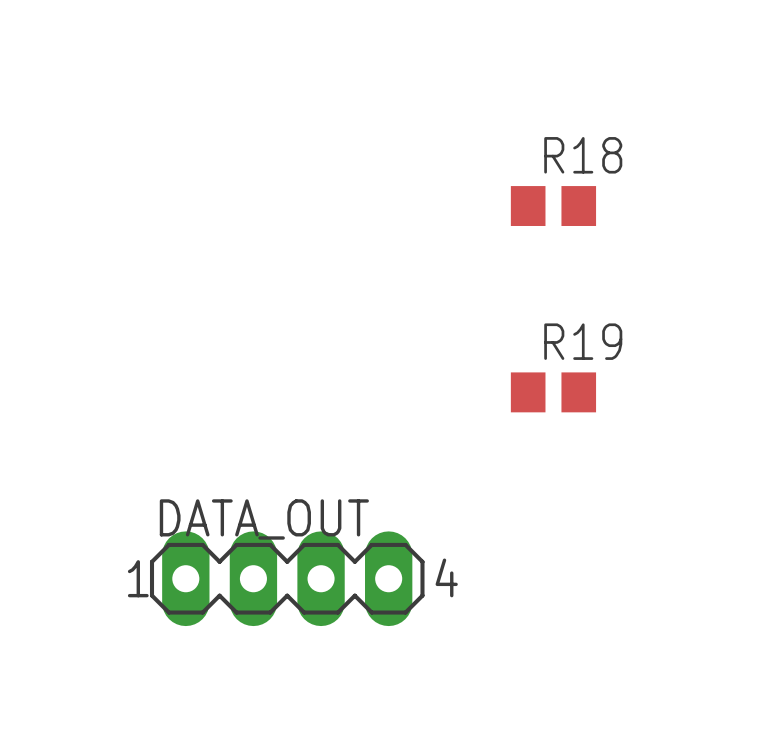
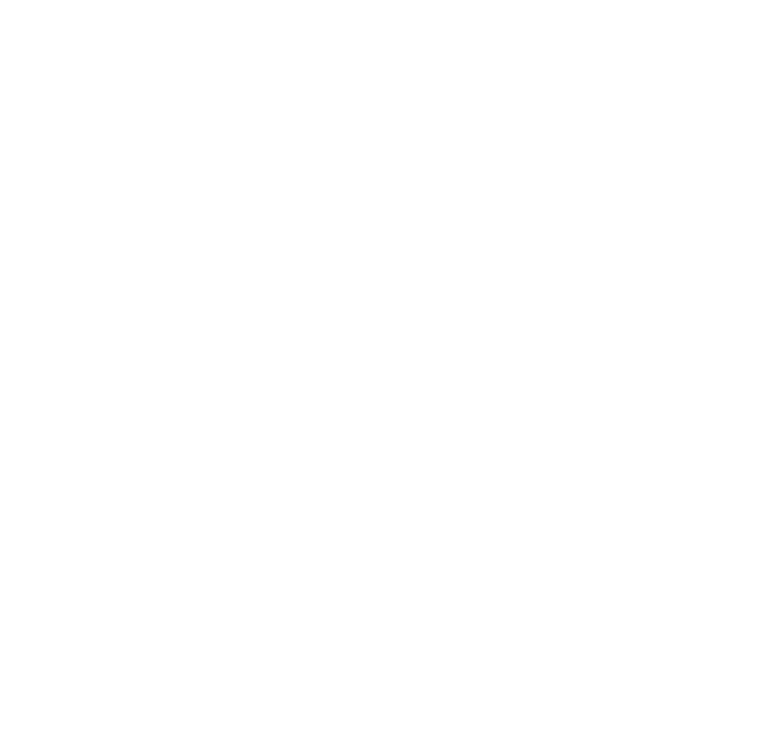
R18: (553, 206) -> none
R19: (553, 392) -> none
DATA_OUT: (287, 578) -> none

